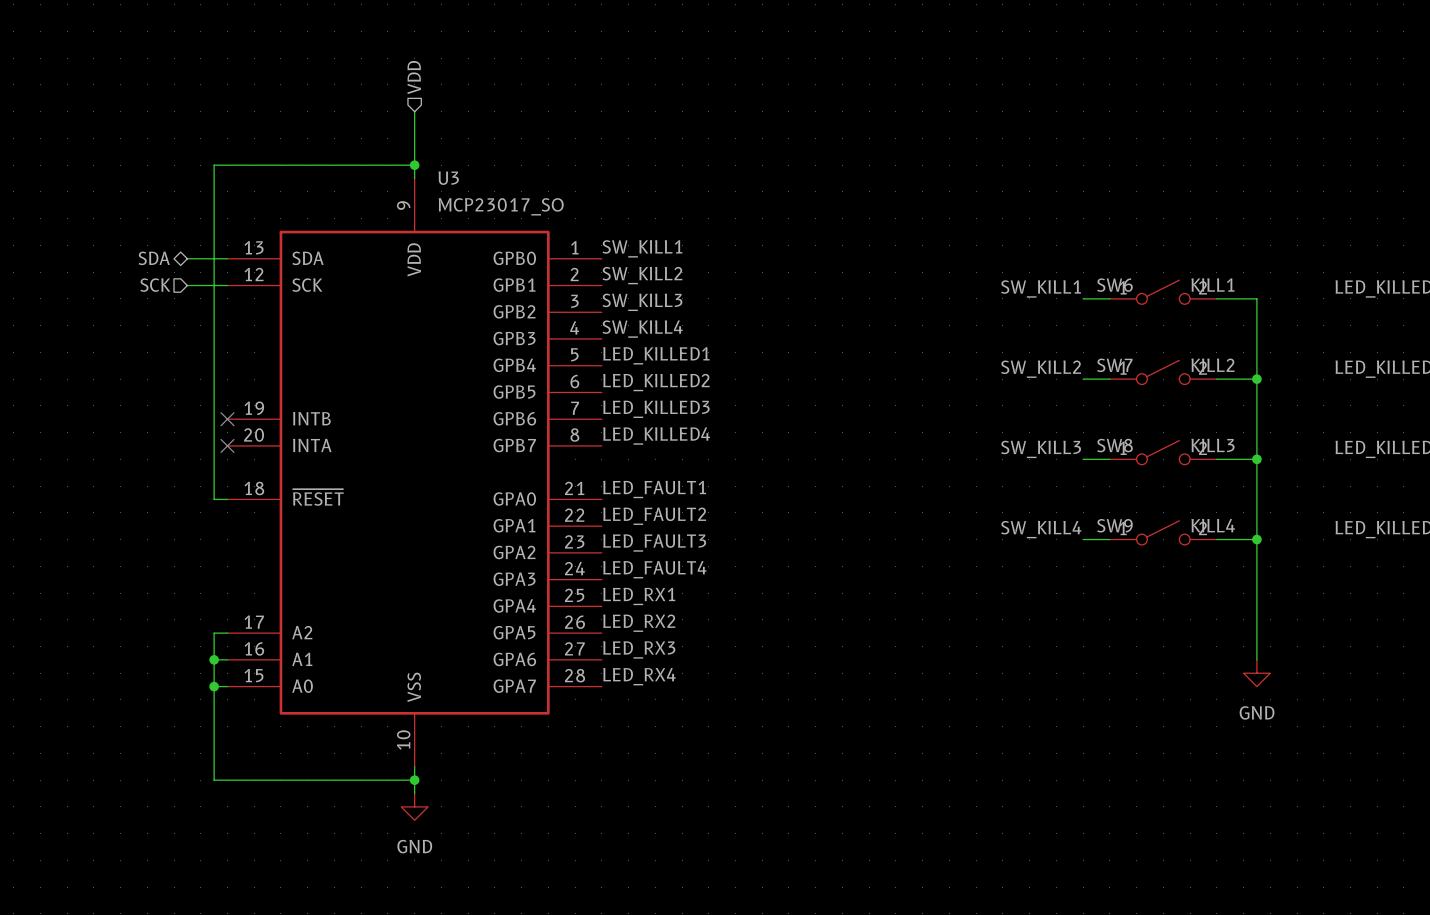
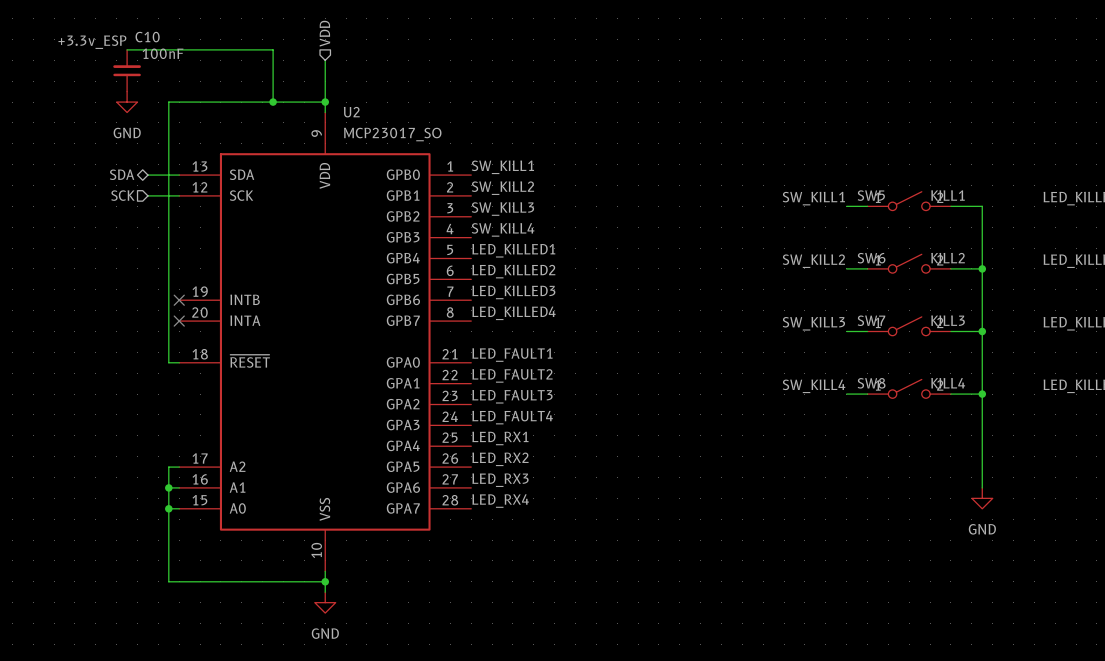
label: none -> +3.3v_ESP (92, 42)
wire: none -> (127, 49) (273, 49) (273, 102)
C10: none -> 100nF (127, 70)
power symbol: none -> GND (127, 102)
junction: none -> (273, 102)
U3 name: U3 (448, 178) -> U2 (351, 112)
SW6 name: SW6 (1114, 285) -> SW5 (871, 195)
SW7 name: SW7 (1114, 365) -> SW6 (871, 258)
SW8 name: SW8 (1115, 445) -> SW7 (871, 320)
SW9 name: SW9 (1114, 525) -> SW8 (871, 383)

